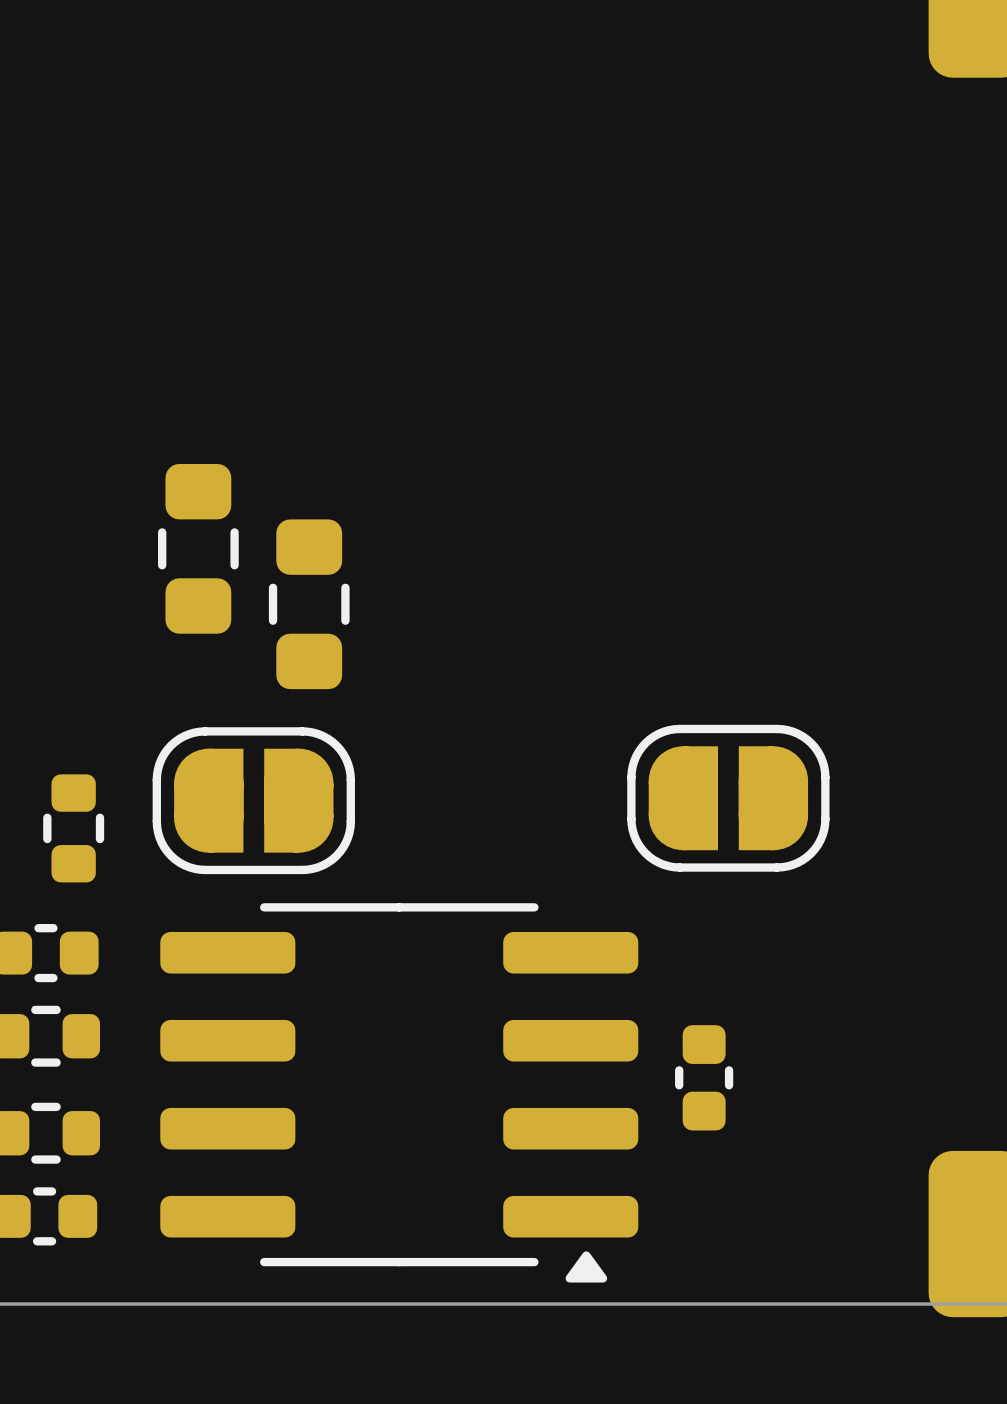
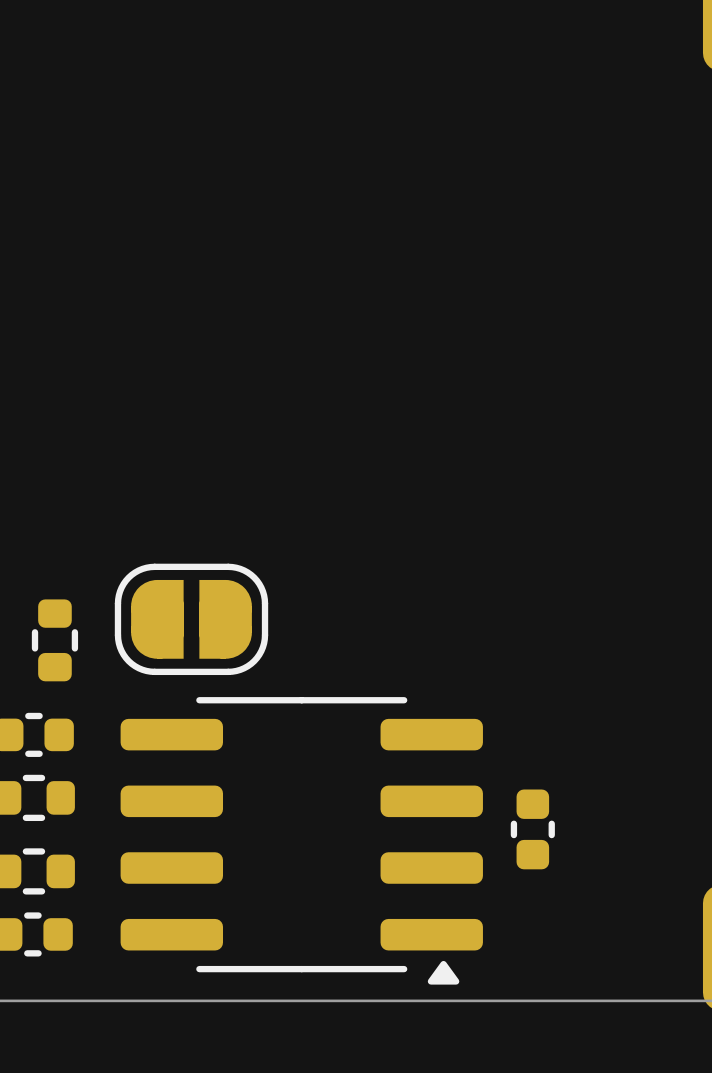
part: (198, 548) -> none
part: (309, 604) -> none
part: (728, 798) -> none

